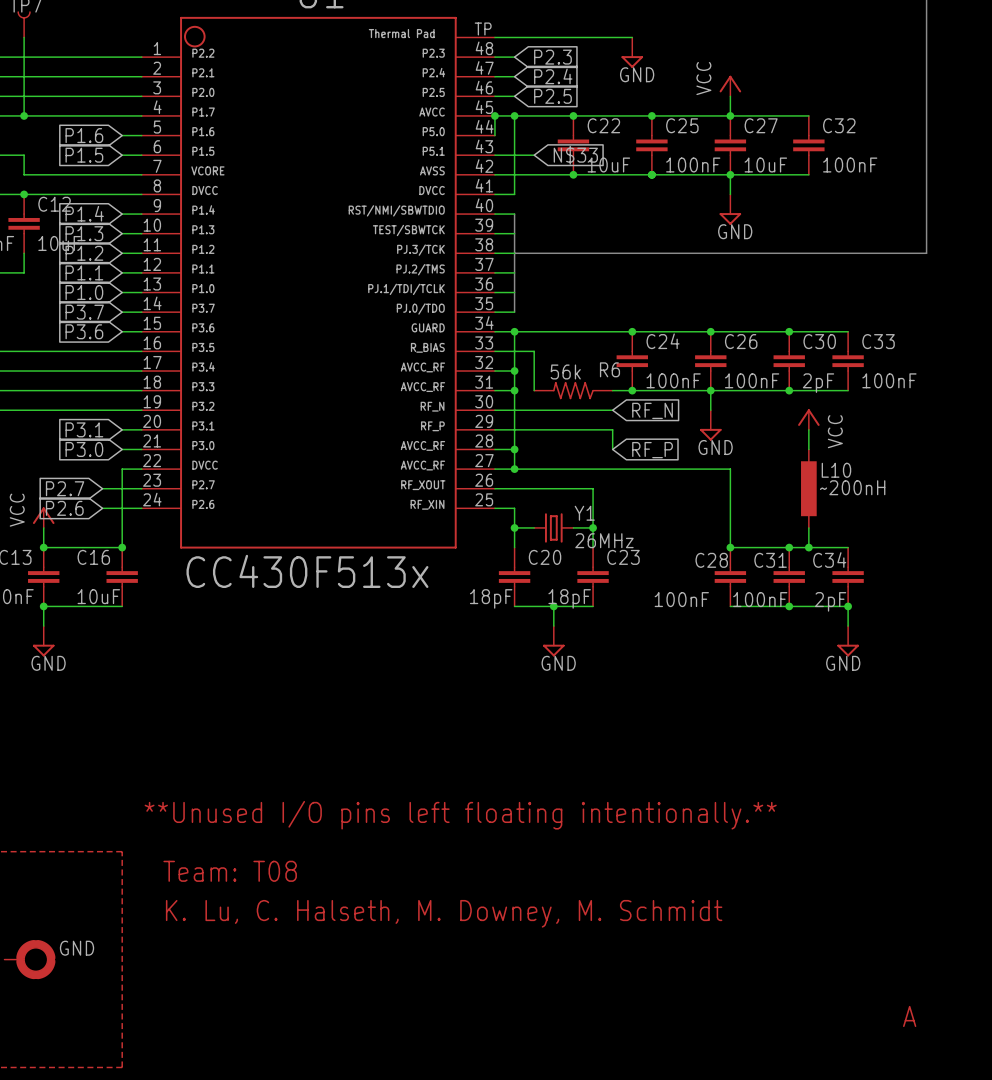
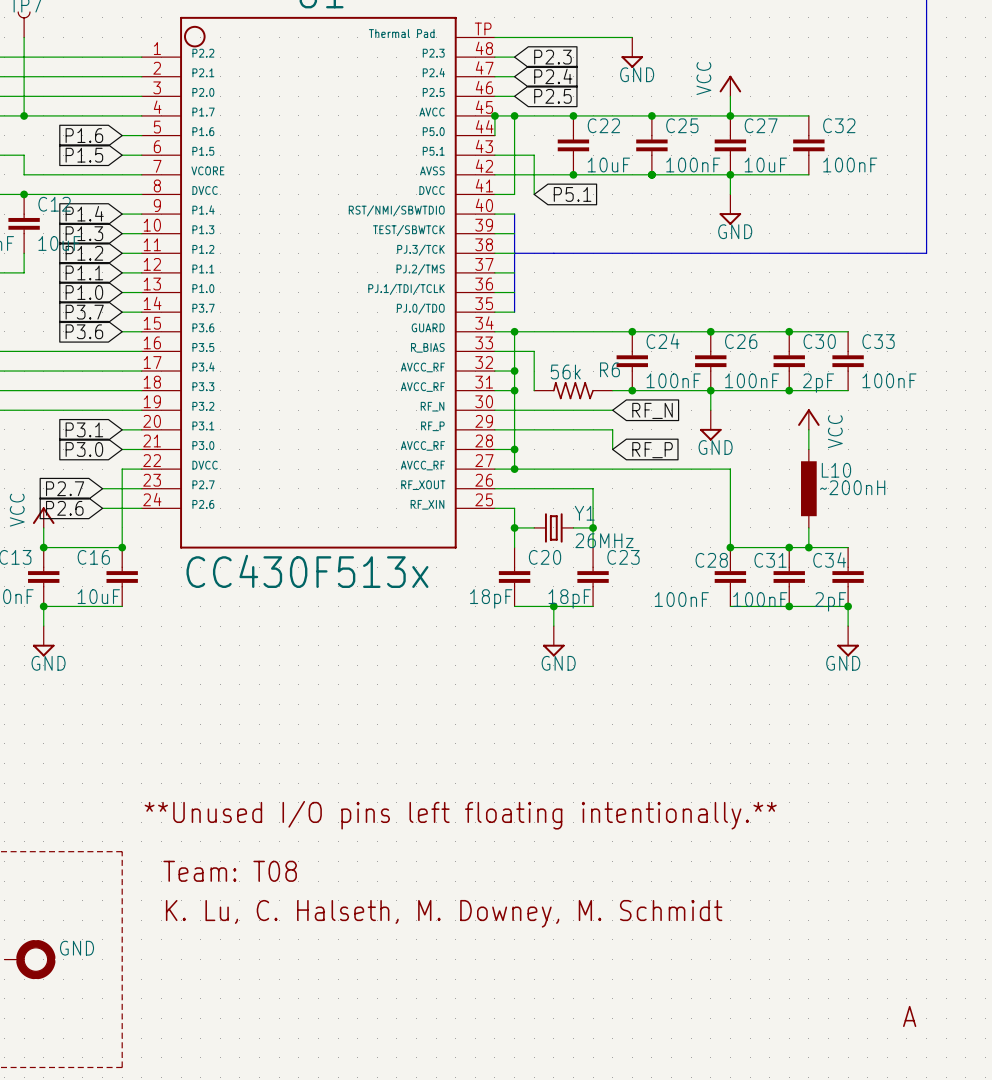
wire: none -> (534, 155) (534, 194)
global label: N$33 (575, 155) -> none
global label: none -> P5.1 (572, 194)

